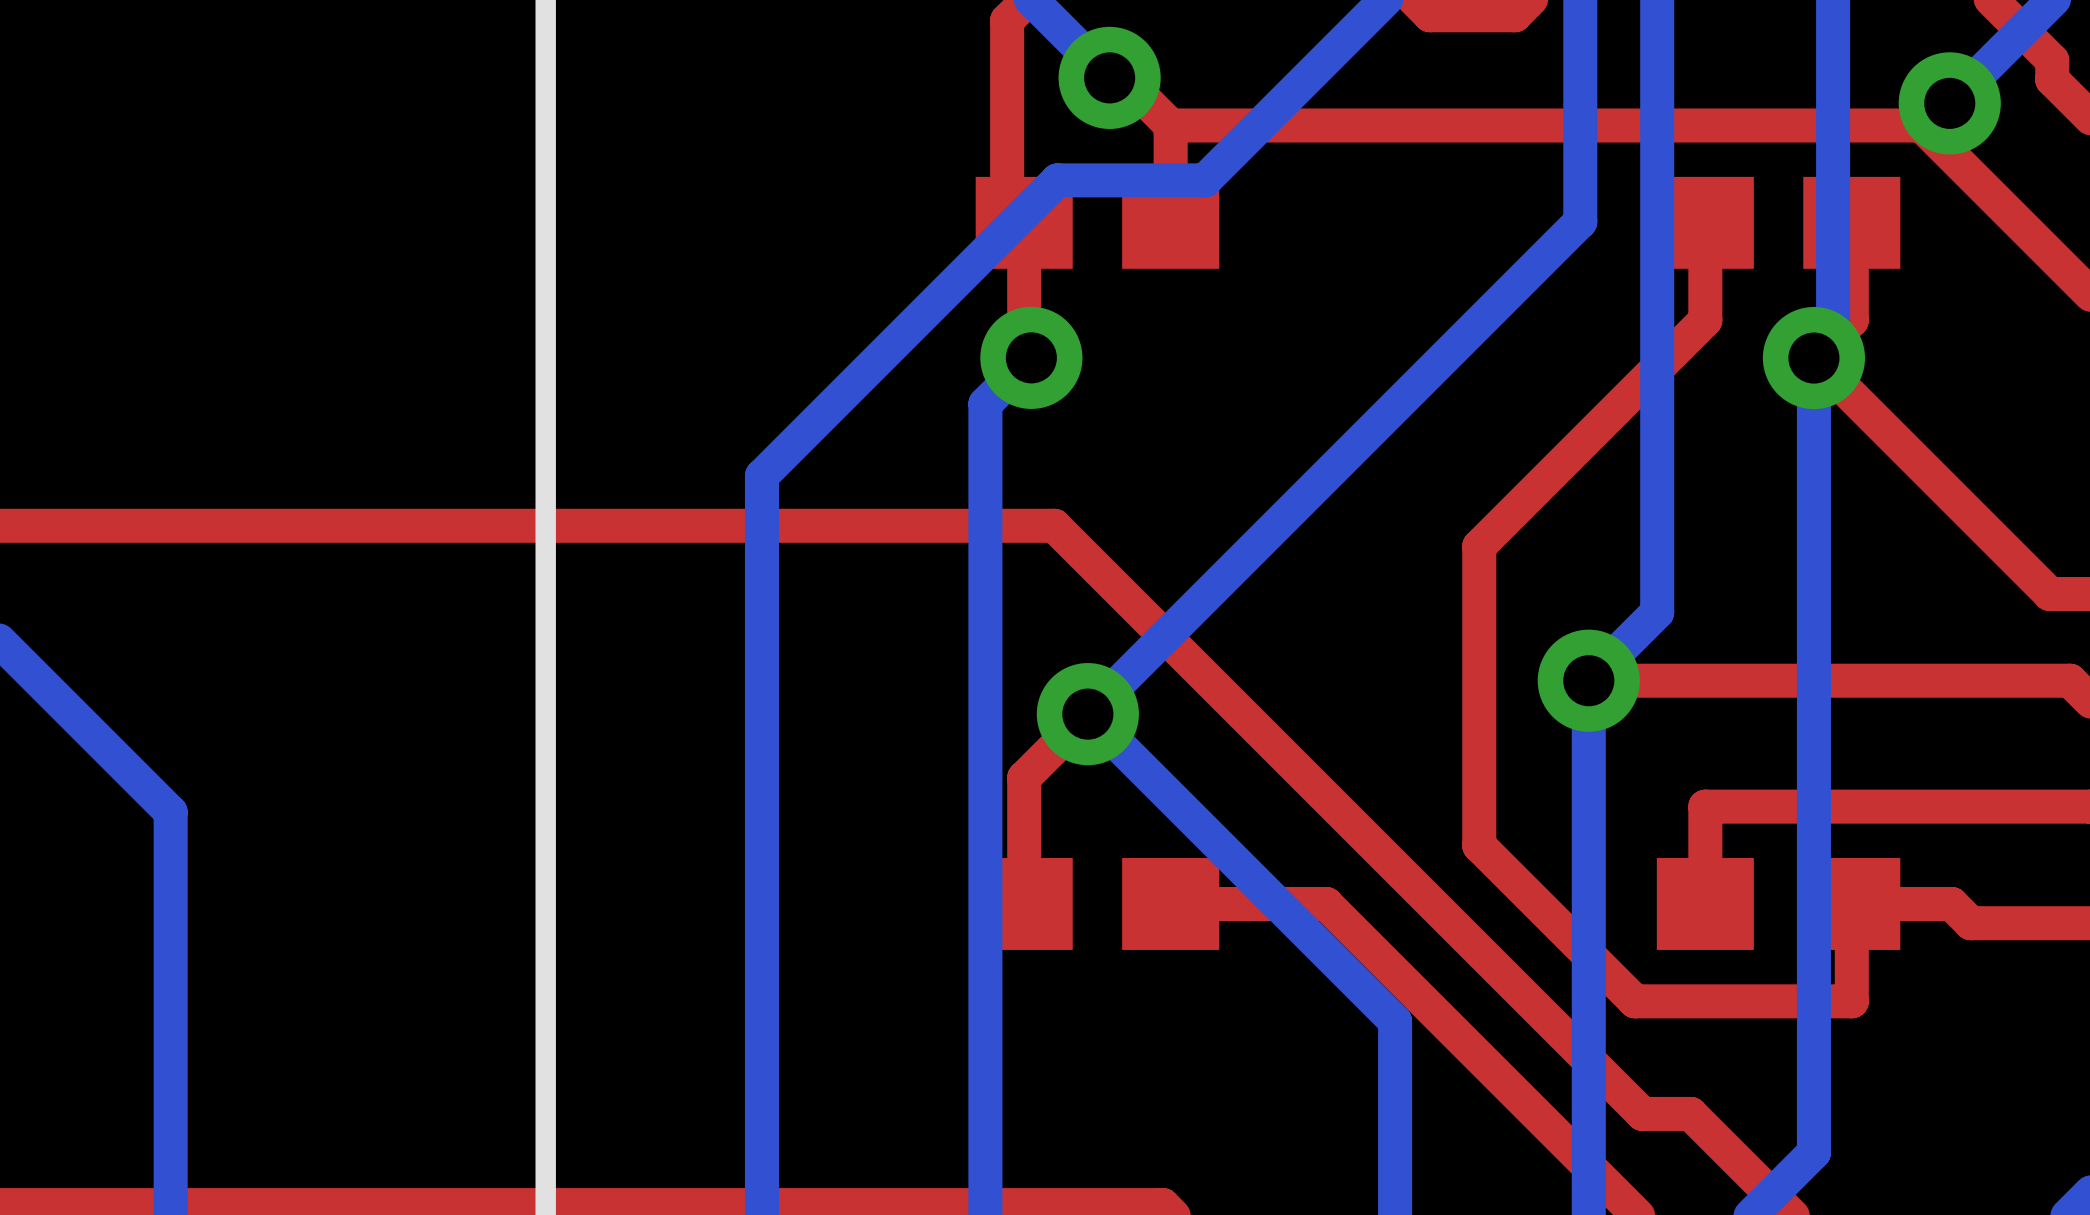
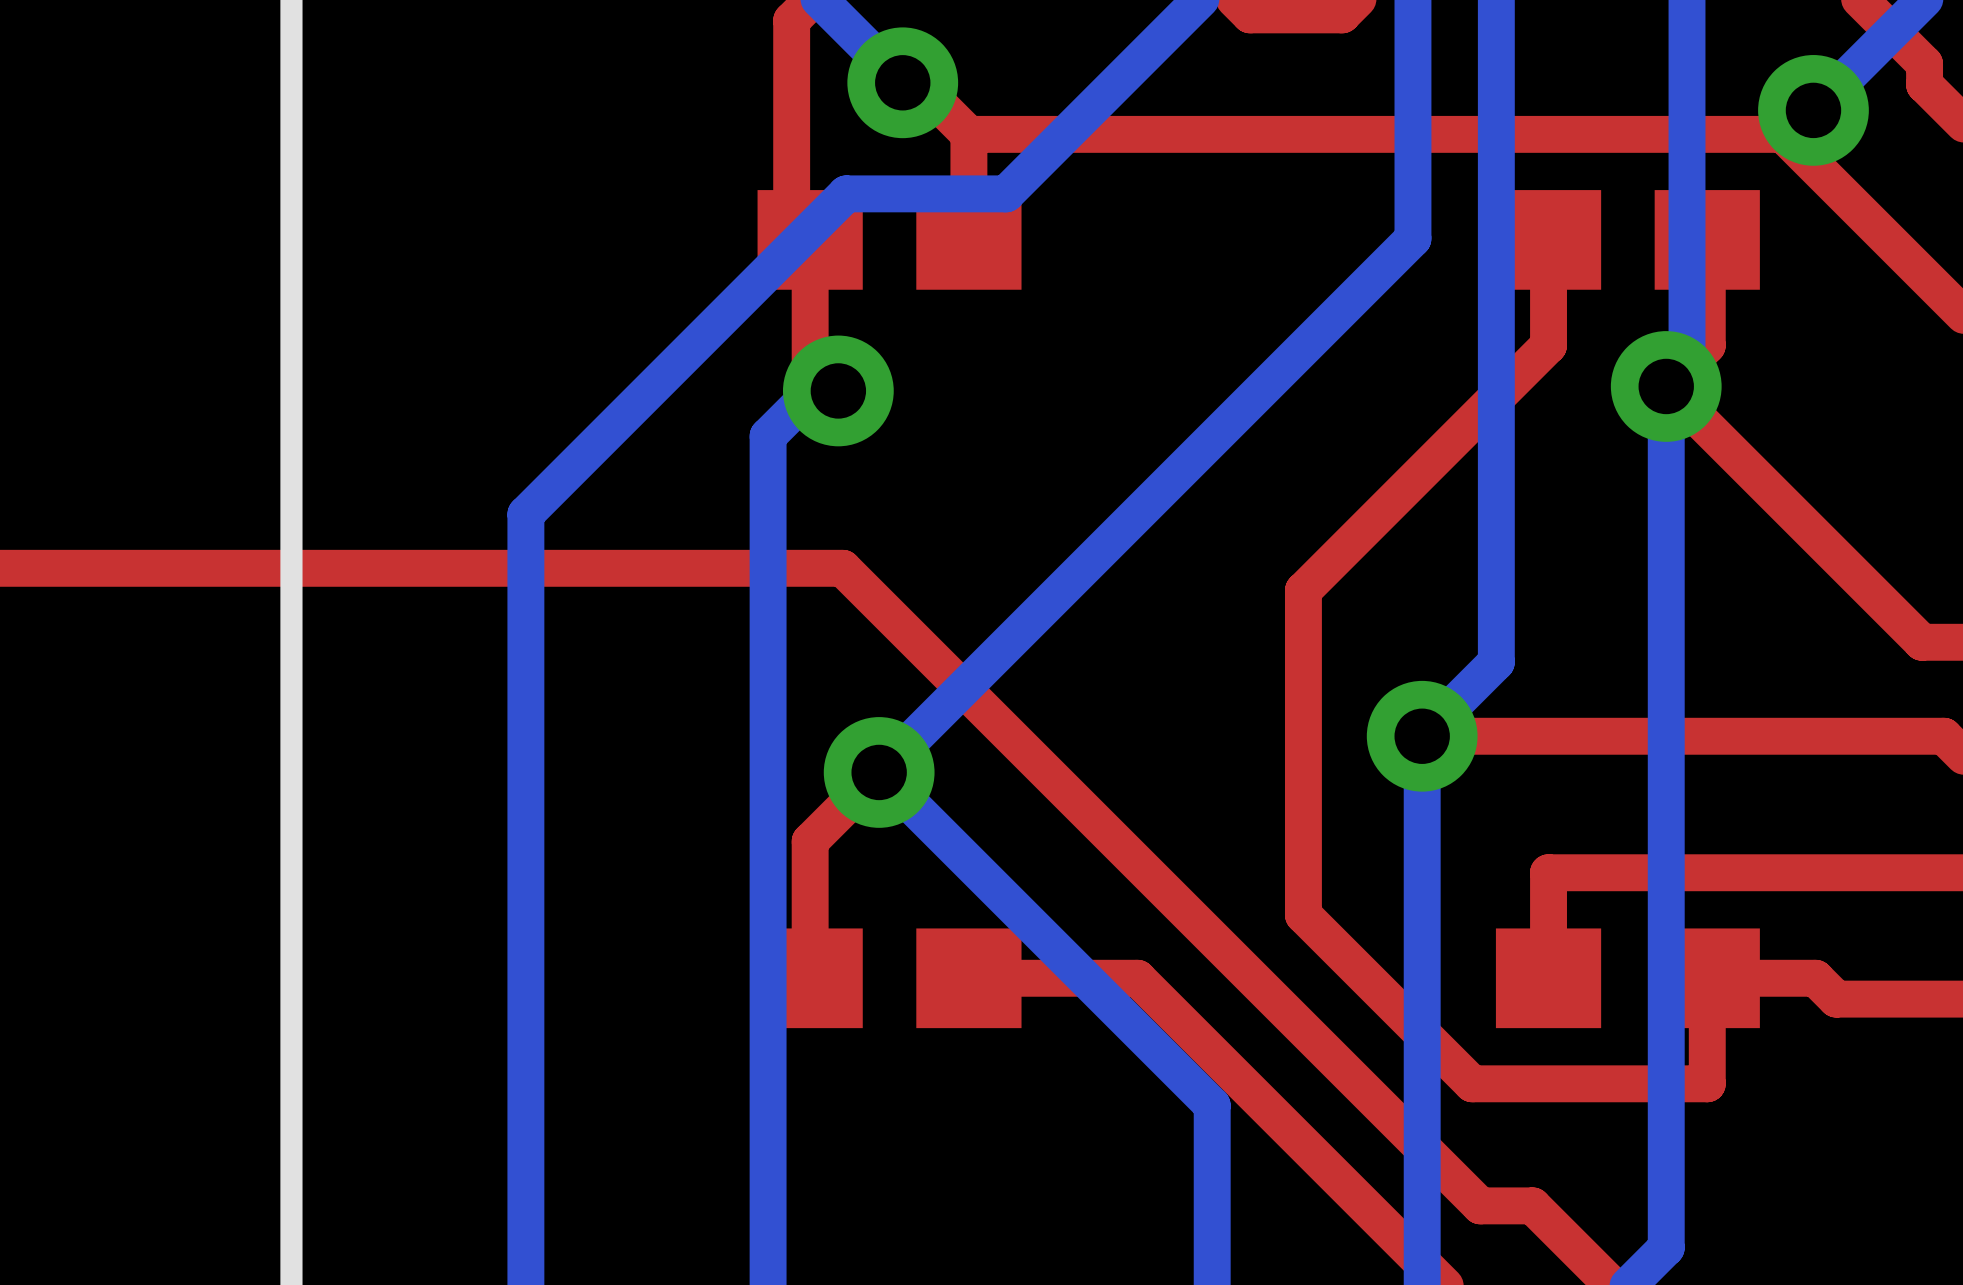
via position: (1031, 357) -> (838, 390)

